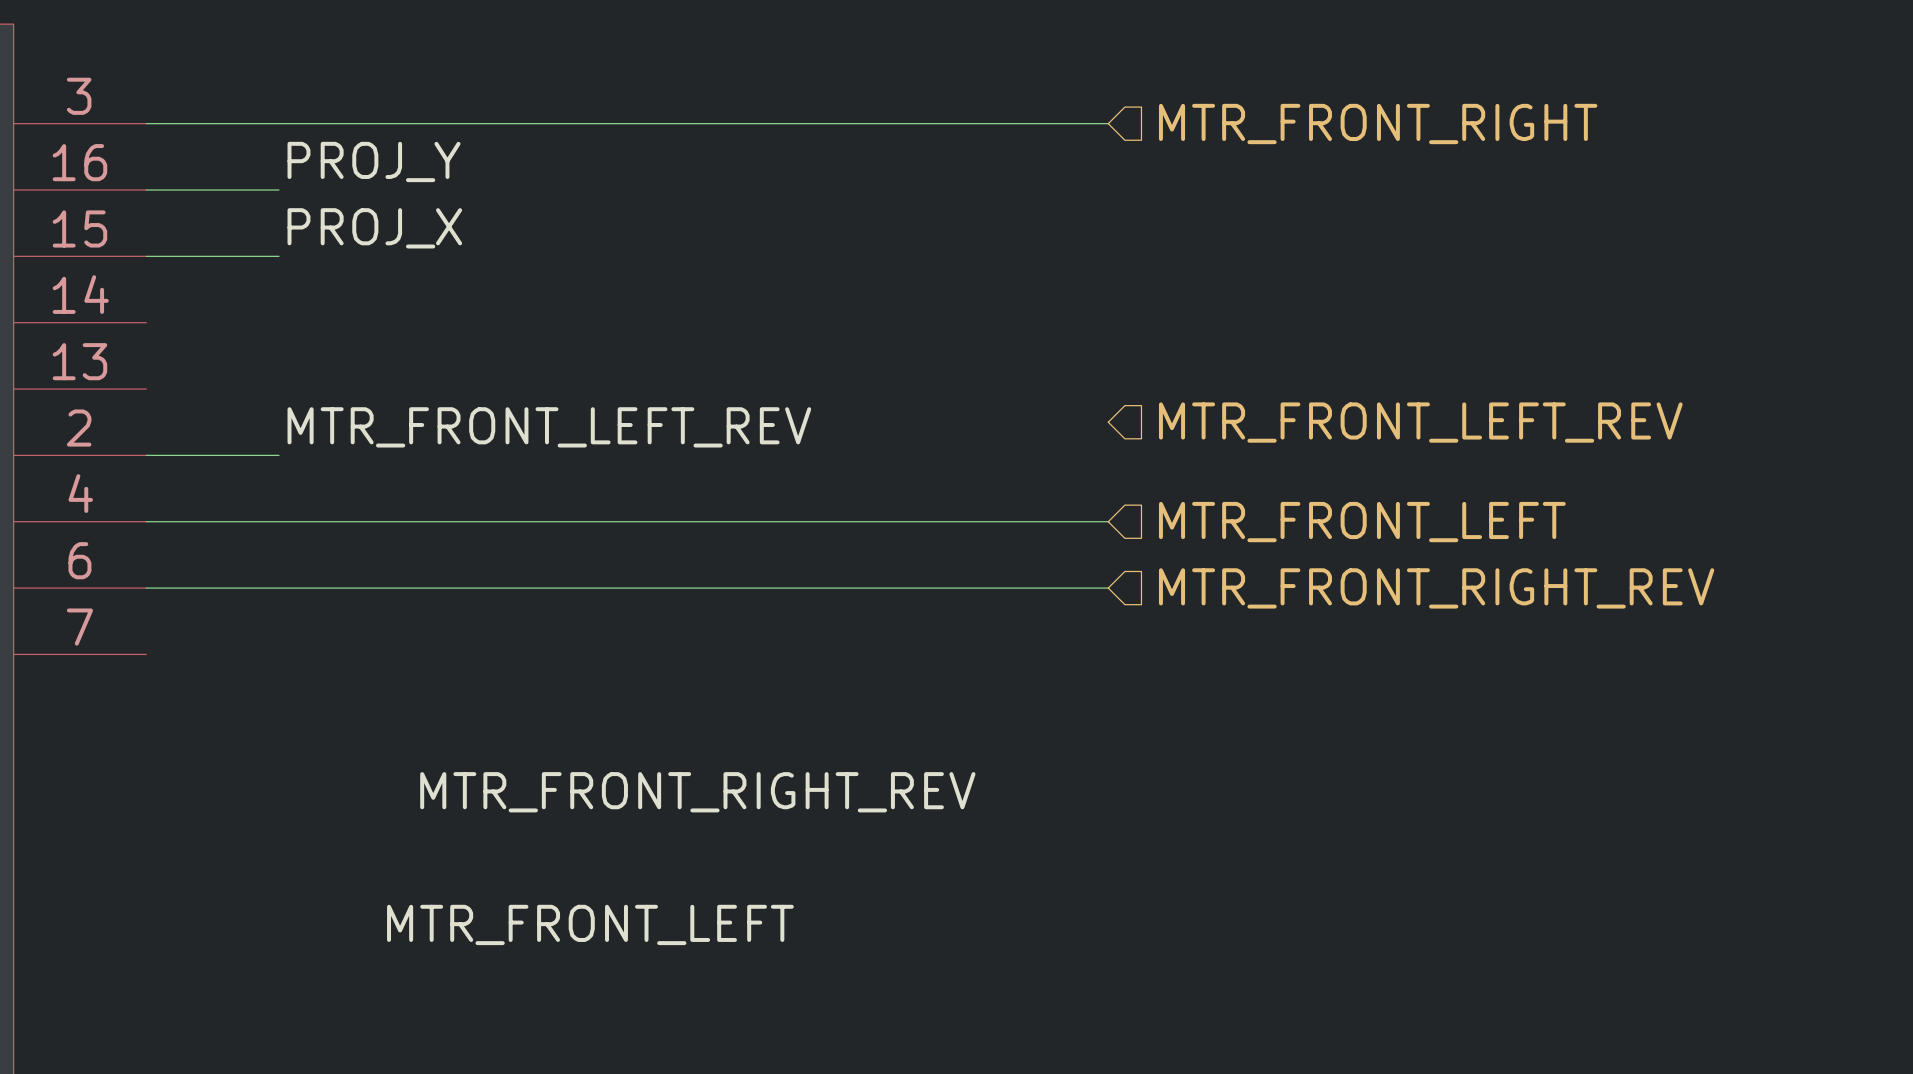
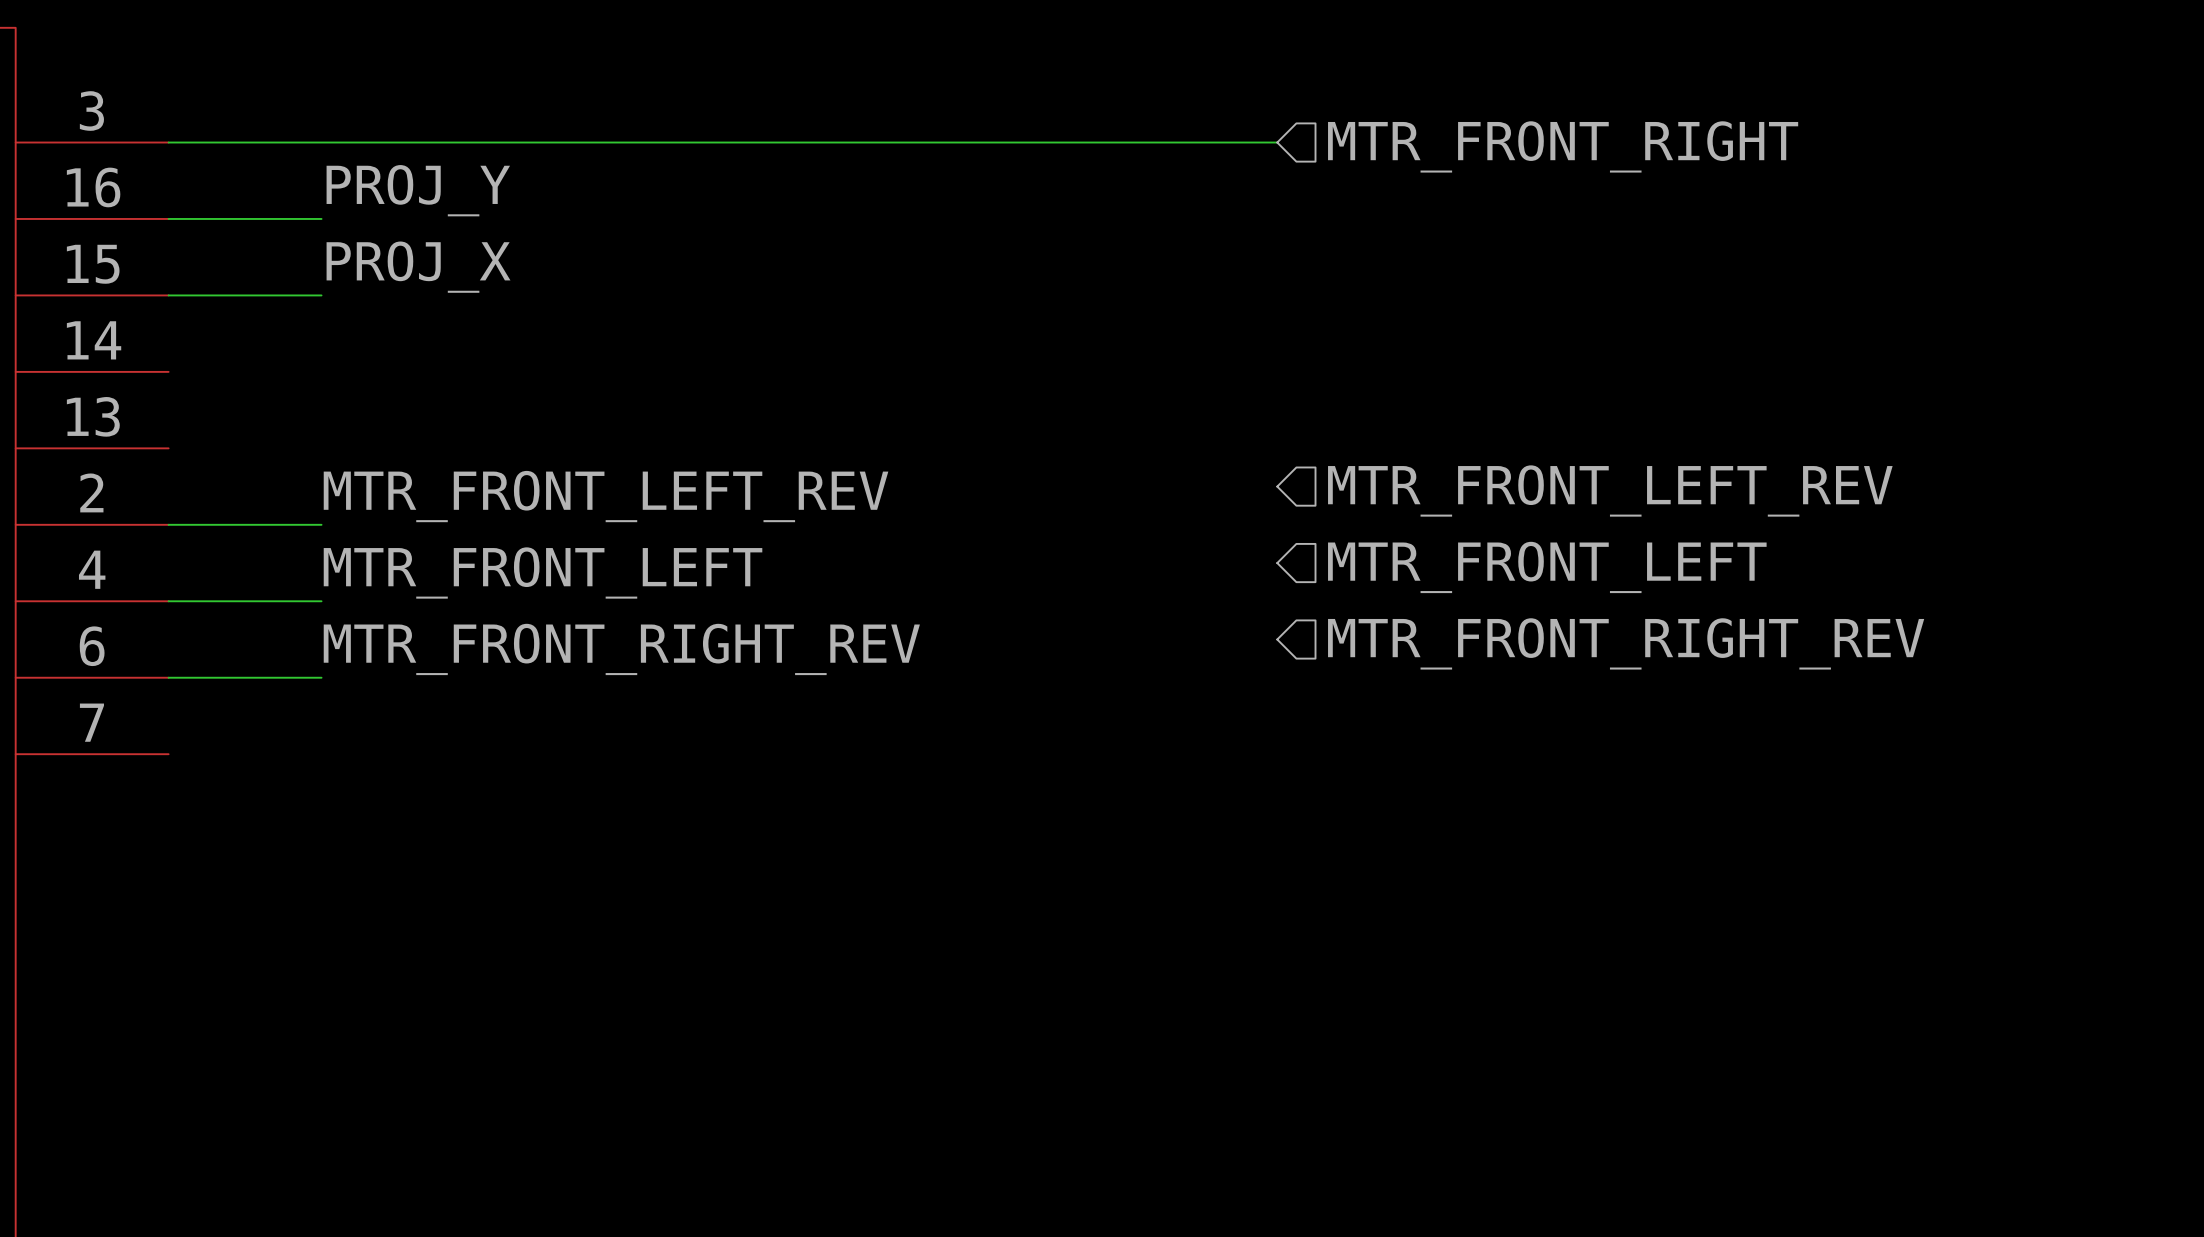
wire: (278, 521) (1108, 521) -> none
hierarchical label position: MTR_FRONT_LEFT (1362, 522) -> MTR_FRONT_LEFT (1547, 567)
wire: (278, 588) (1108, 588) -> none
hierarchical label position: MTR_FRONT_RIGHT_REV (1436, 588) -> MTR_FRONT_RIGHT_REV (1626, 643)
label position: MTR_FRONT_RIGHT_REV (697, 792) -> MTR_FRONT_RIGHT_REV (621, 649)
label position: MTR_FRONT_LEFT (590, 924) -> MTR_FRONT_LEFT (543, 572)

